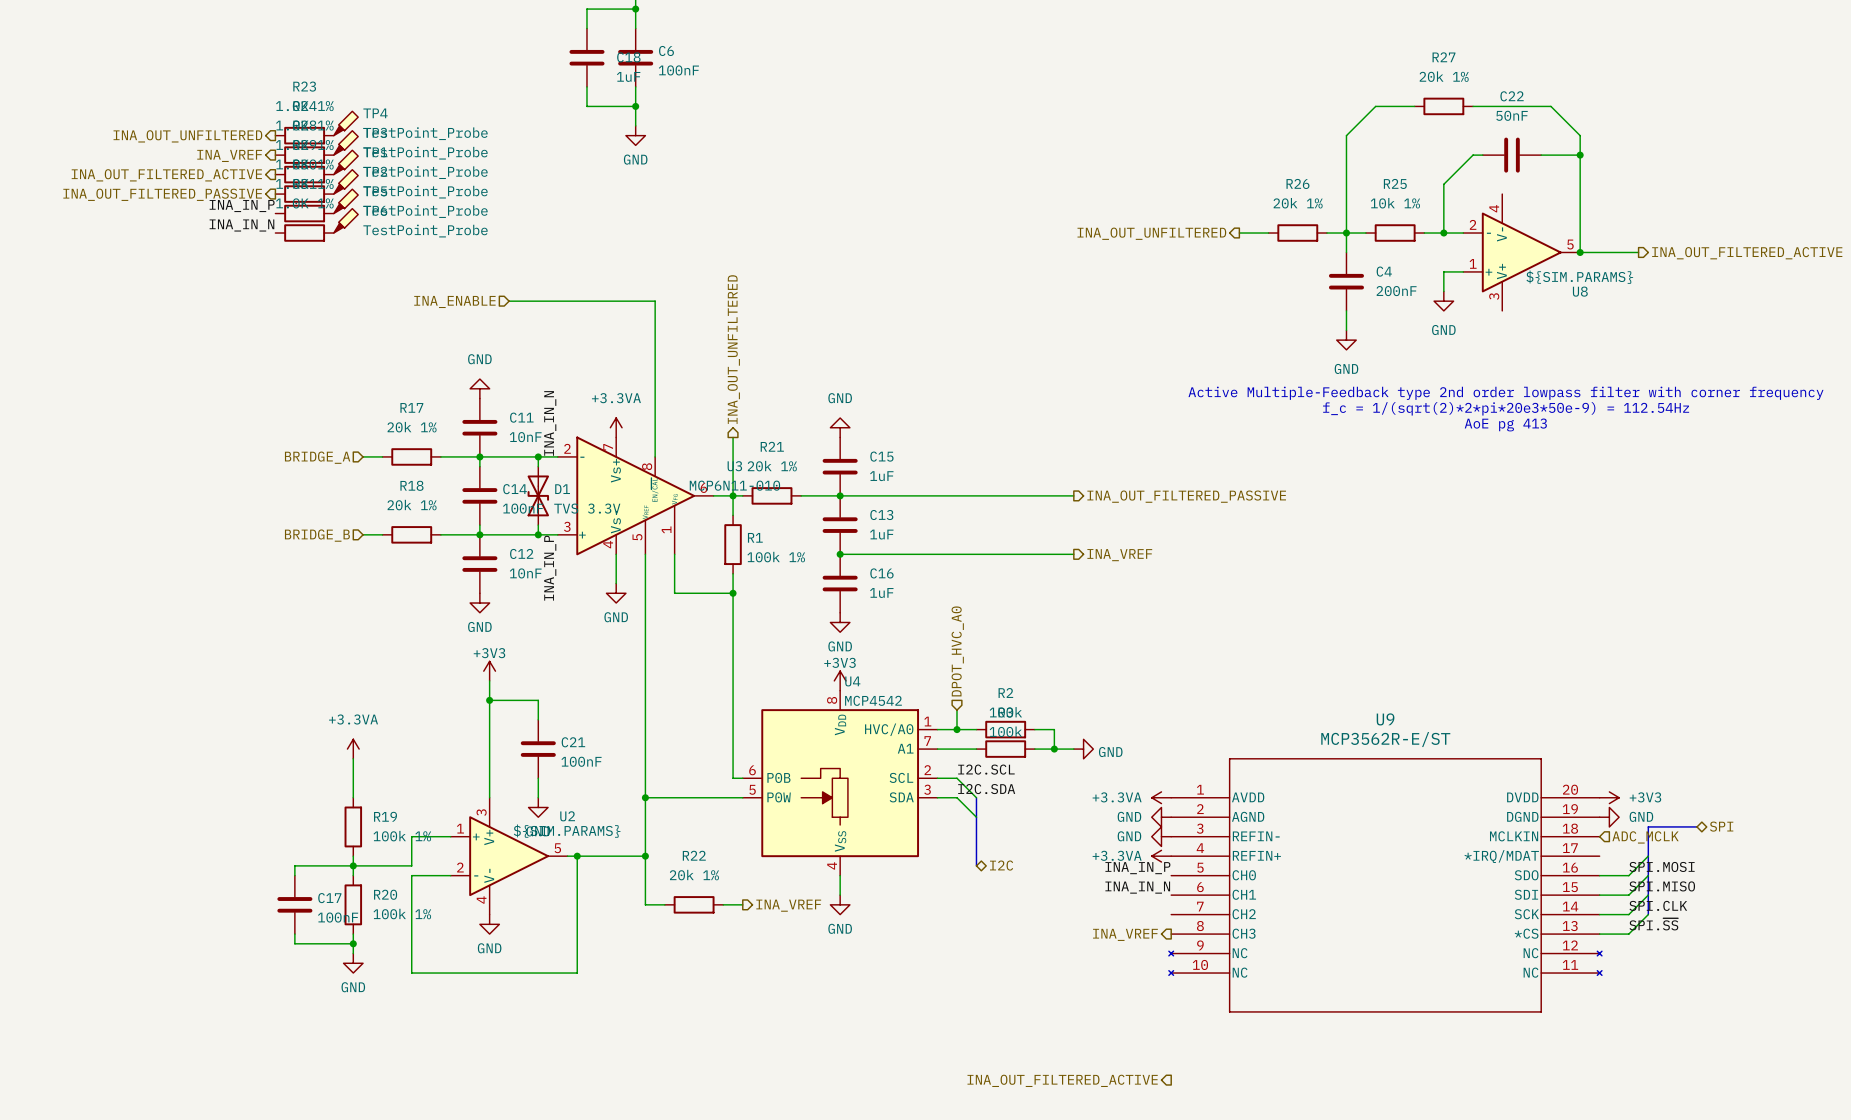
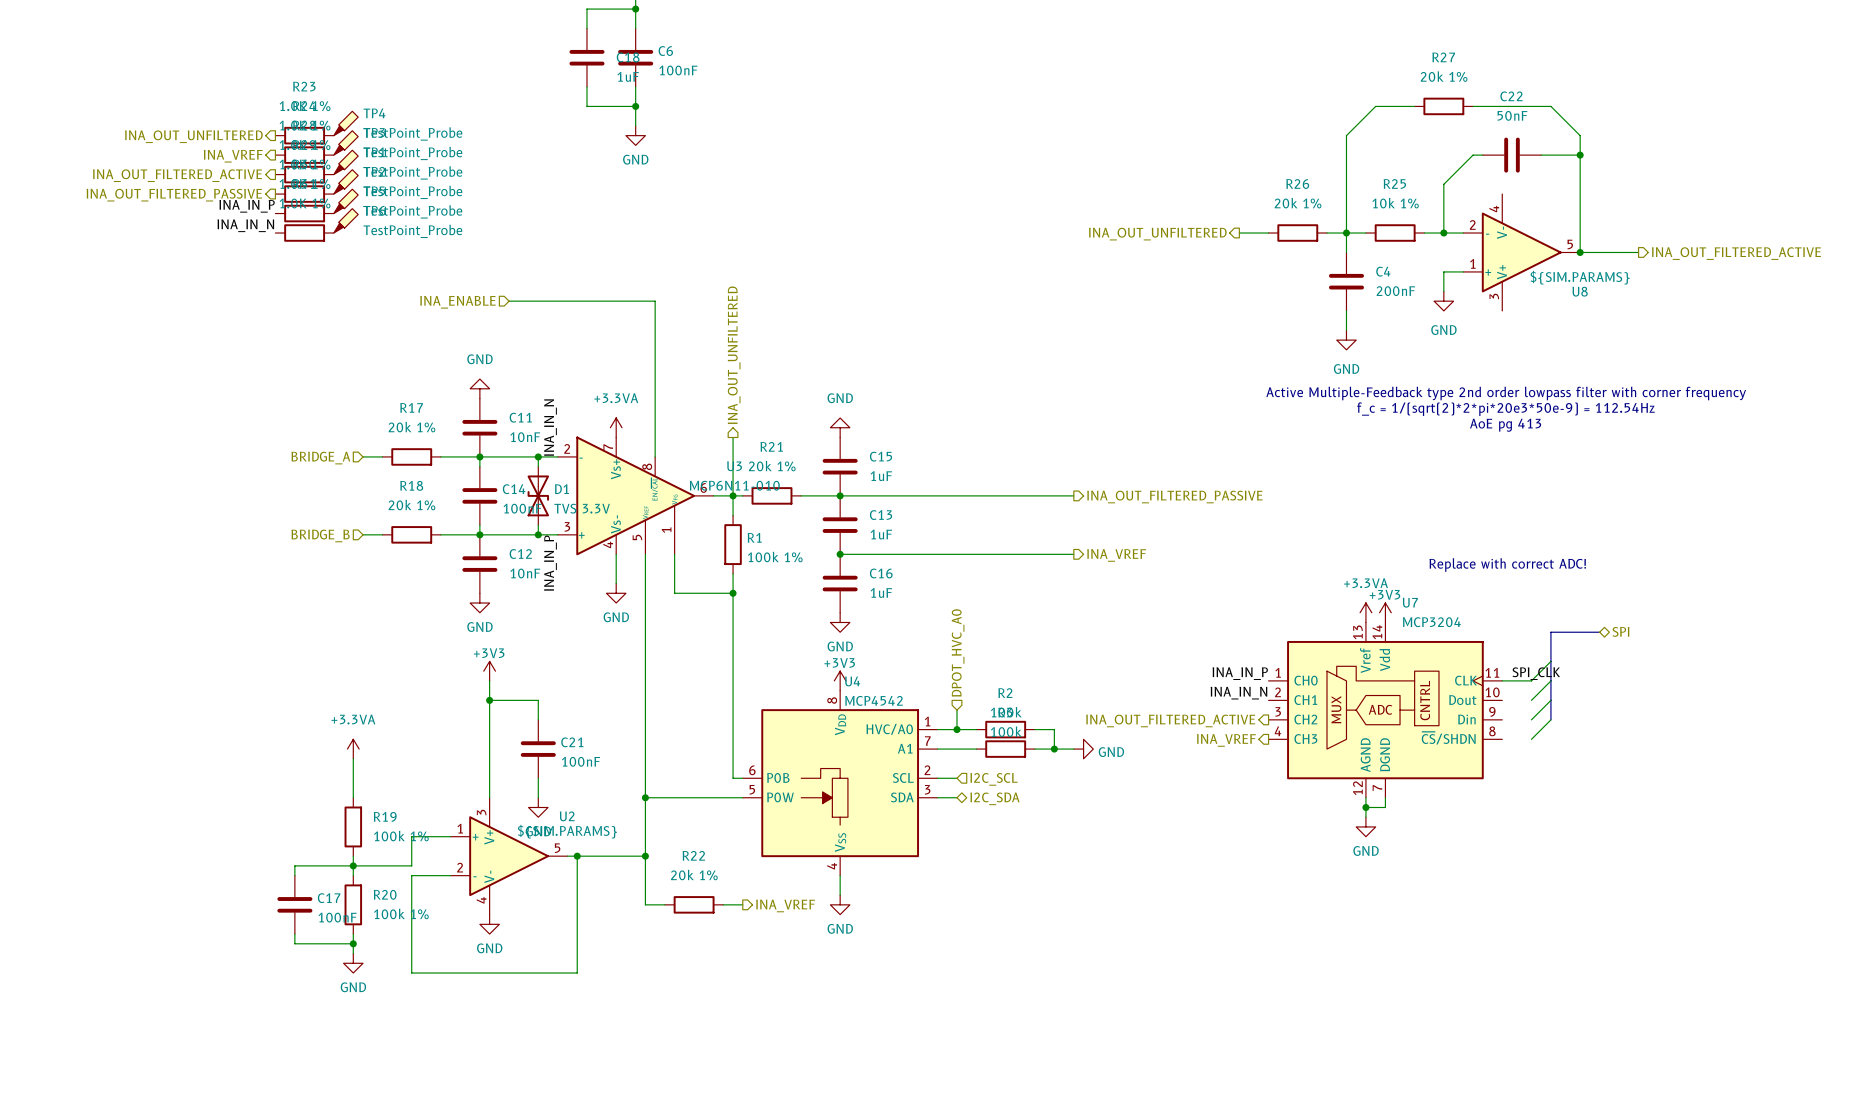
text: none -> Replace with correct ADC! (1507, 565)
power symbol: none -> +3.3VA (1365, 612)
power symbol: none -> +3V3 (1385, 612)
hierarchical label: none -> SPI (1620, 631)
bus: none -> (1599, 632) (1550, 632) (1550, 719)
wire: none -> (1550, 661) (1531, 680) (1502, 680)
label: none -> INA_IN_P (1240, 673)
label: none -> SPI_CLK (1536, 673)
wire: none -> (1550, 680) (1531, 700)
label: none -> INA_IN_N (1238, 693)
wire: none -> (1550, 700) (1531, 719)
U7: none -> MCP3204 (1385, 710)
wire: none -> (1550, 719) (1531, 739)
hierarchical label: none -> INA_OUT_FILTERED_ACTIVE (1170, 720)
hierarchical label: none -> INA_VREF (1226, 740)
label: I2C.SCL (986, 769) -> none
wire: (956, 778) (976, 797) -> none
hierarchical label: none -> I2C_SCL (994, 779)
label: I2C.SDA (986, 789) -> none
wire: (956, 797) (976, 817) -> none
bus: (976, 797) (976, 865) -> none
power symbol: +3.3VA (1161, 797) -> none
wire: none -> (1365, 797) (1365, 817)
wire: none -> (1385, 797) (1385, 807) (1365, 807)
power symbol: +3V3 (1609, 797) -> none
hierarchical label: none -> I2C_SDA (994, 798)
junction: none -> (1365, 807)
power symbol: GND (1161, 817) -> none
power symbol: GND (1609, 817) -> none
power symbol: none -> GND (1365, 826)
bus: (1697, 826) (1648, 826) (1648, 914) -> none
hierarchical label: SPI (1721, 826) -> none
power symbol: GND (1161, 836) -> none
hierarchical label: ADC_MCLK (1645, 837) -> none
power symbol: +3.3VA (1161, 856) -> none
wire: (1648, 856) (1628, 875) (1599, 875) -> none
hierarchical label: I2C (1001, 865) -> none
label: SPI.MOSI (1662, 866) -> none
label: INA_IN_P (1137, 868) -> none
wire: (1648, 875) (1628, 895) (1599, 895) -> none
U9: MCP3562R-E/ST (1385, 885) -> none
label: SPI.MISO (1662, 886) -> none
label: INA_IN_N (1137, 887) -> none
wire: (1648, 895) (1628, 914) (1599, 914) -> none
label: SPI.CLK (1658, 905) -> none
wire: (1648, 914) (1628, 934) (1599, 934) -> none
label: SPI.~{SS} (1653, 924) -> none
hierarchical label: INA_VREF (1125, 934) -> none
hierarchical label: INA_OUT_FILTERED_ACTIVE (1062, 1080) -> none

